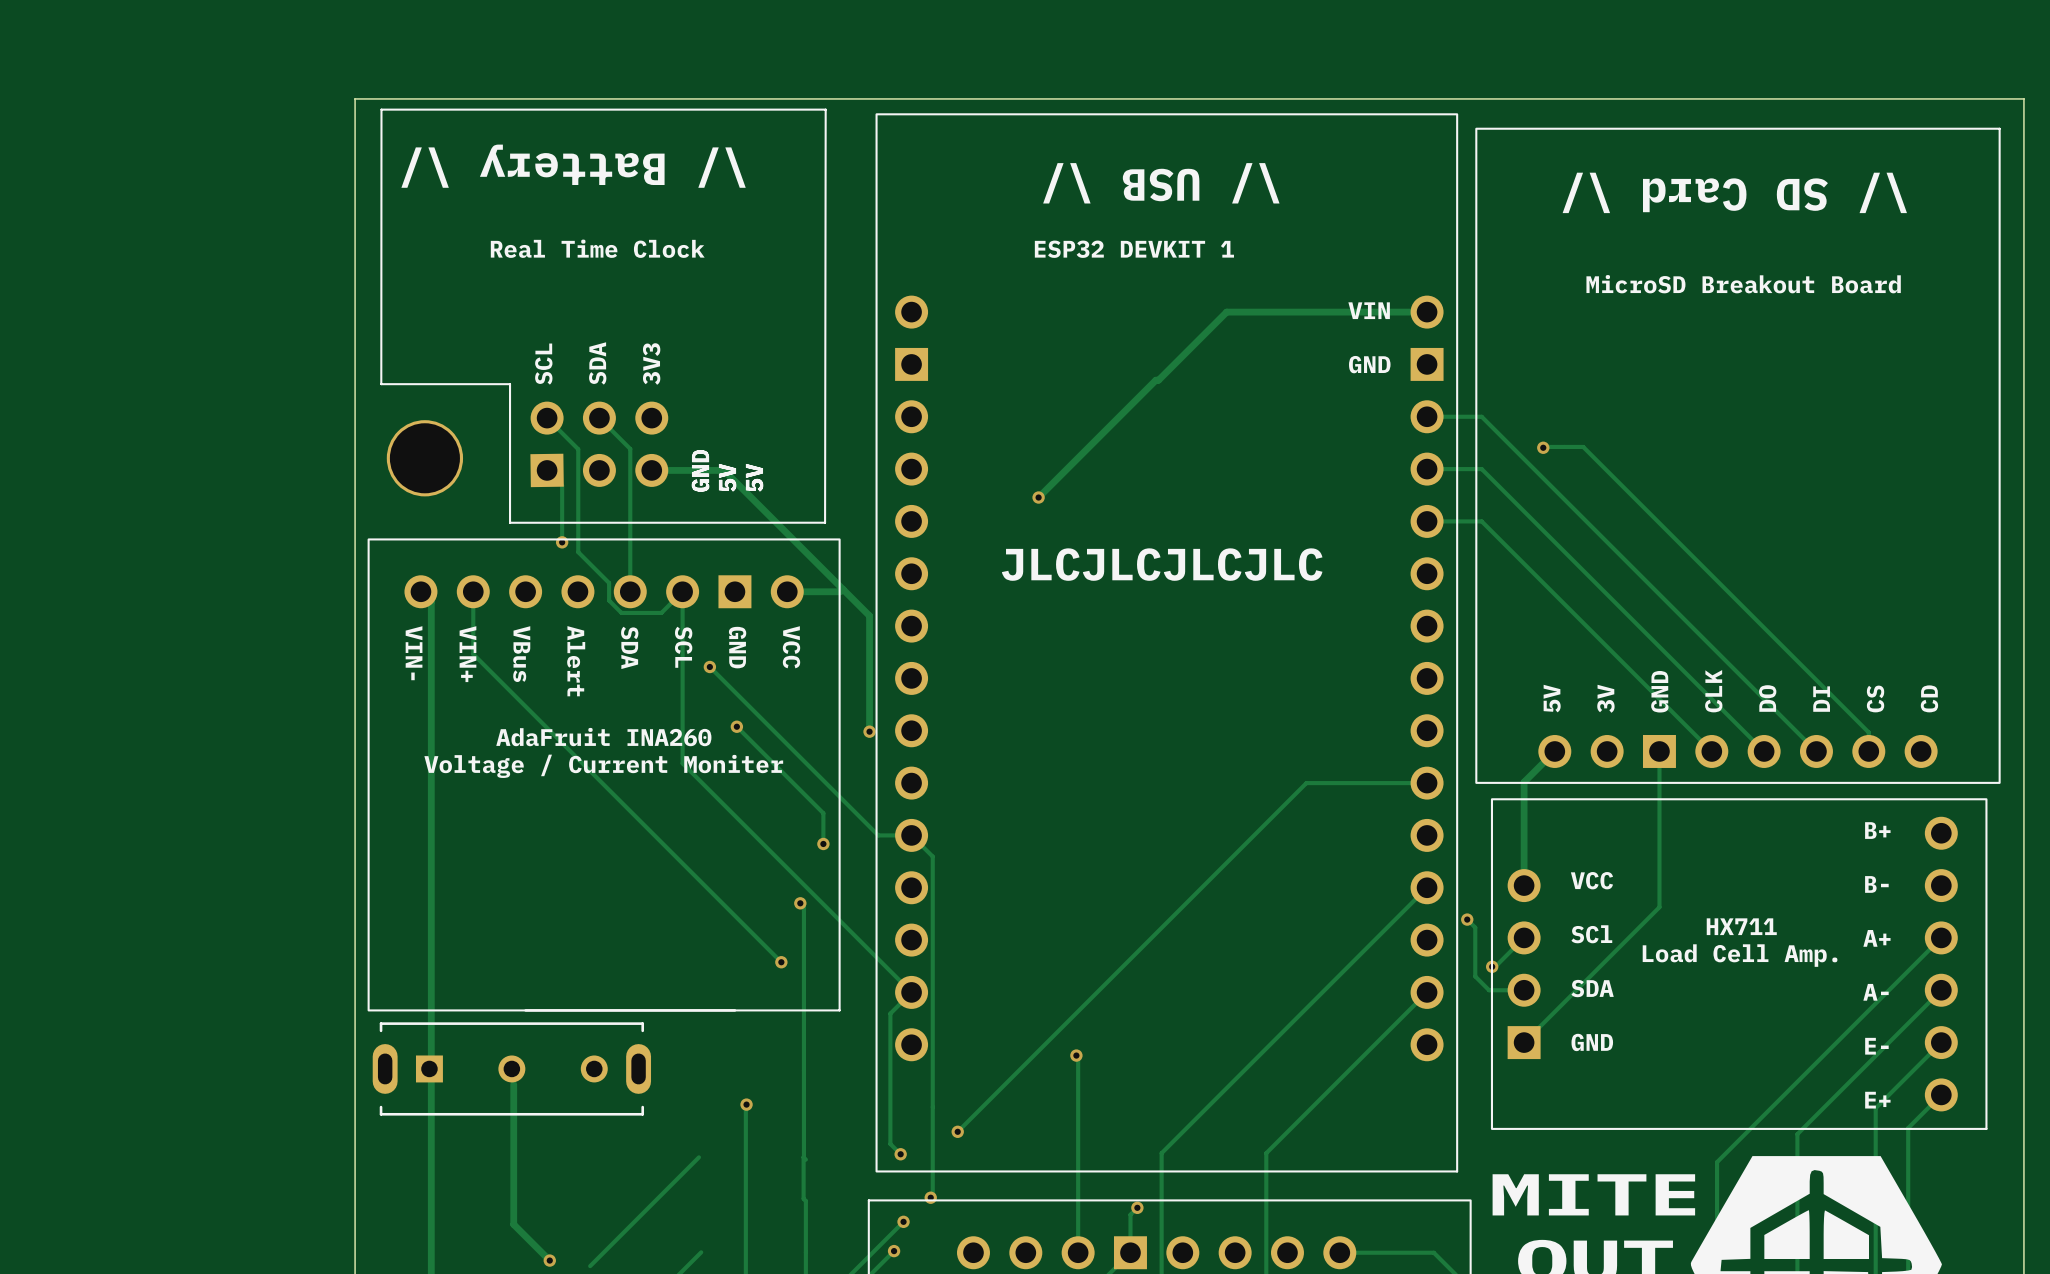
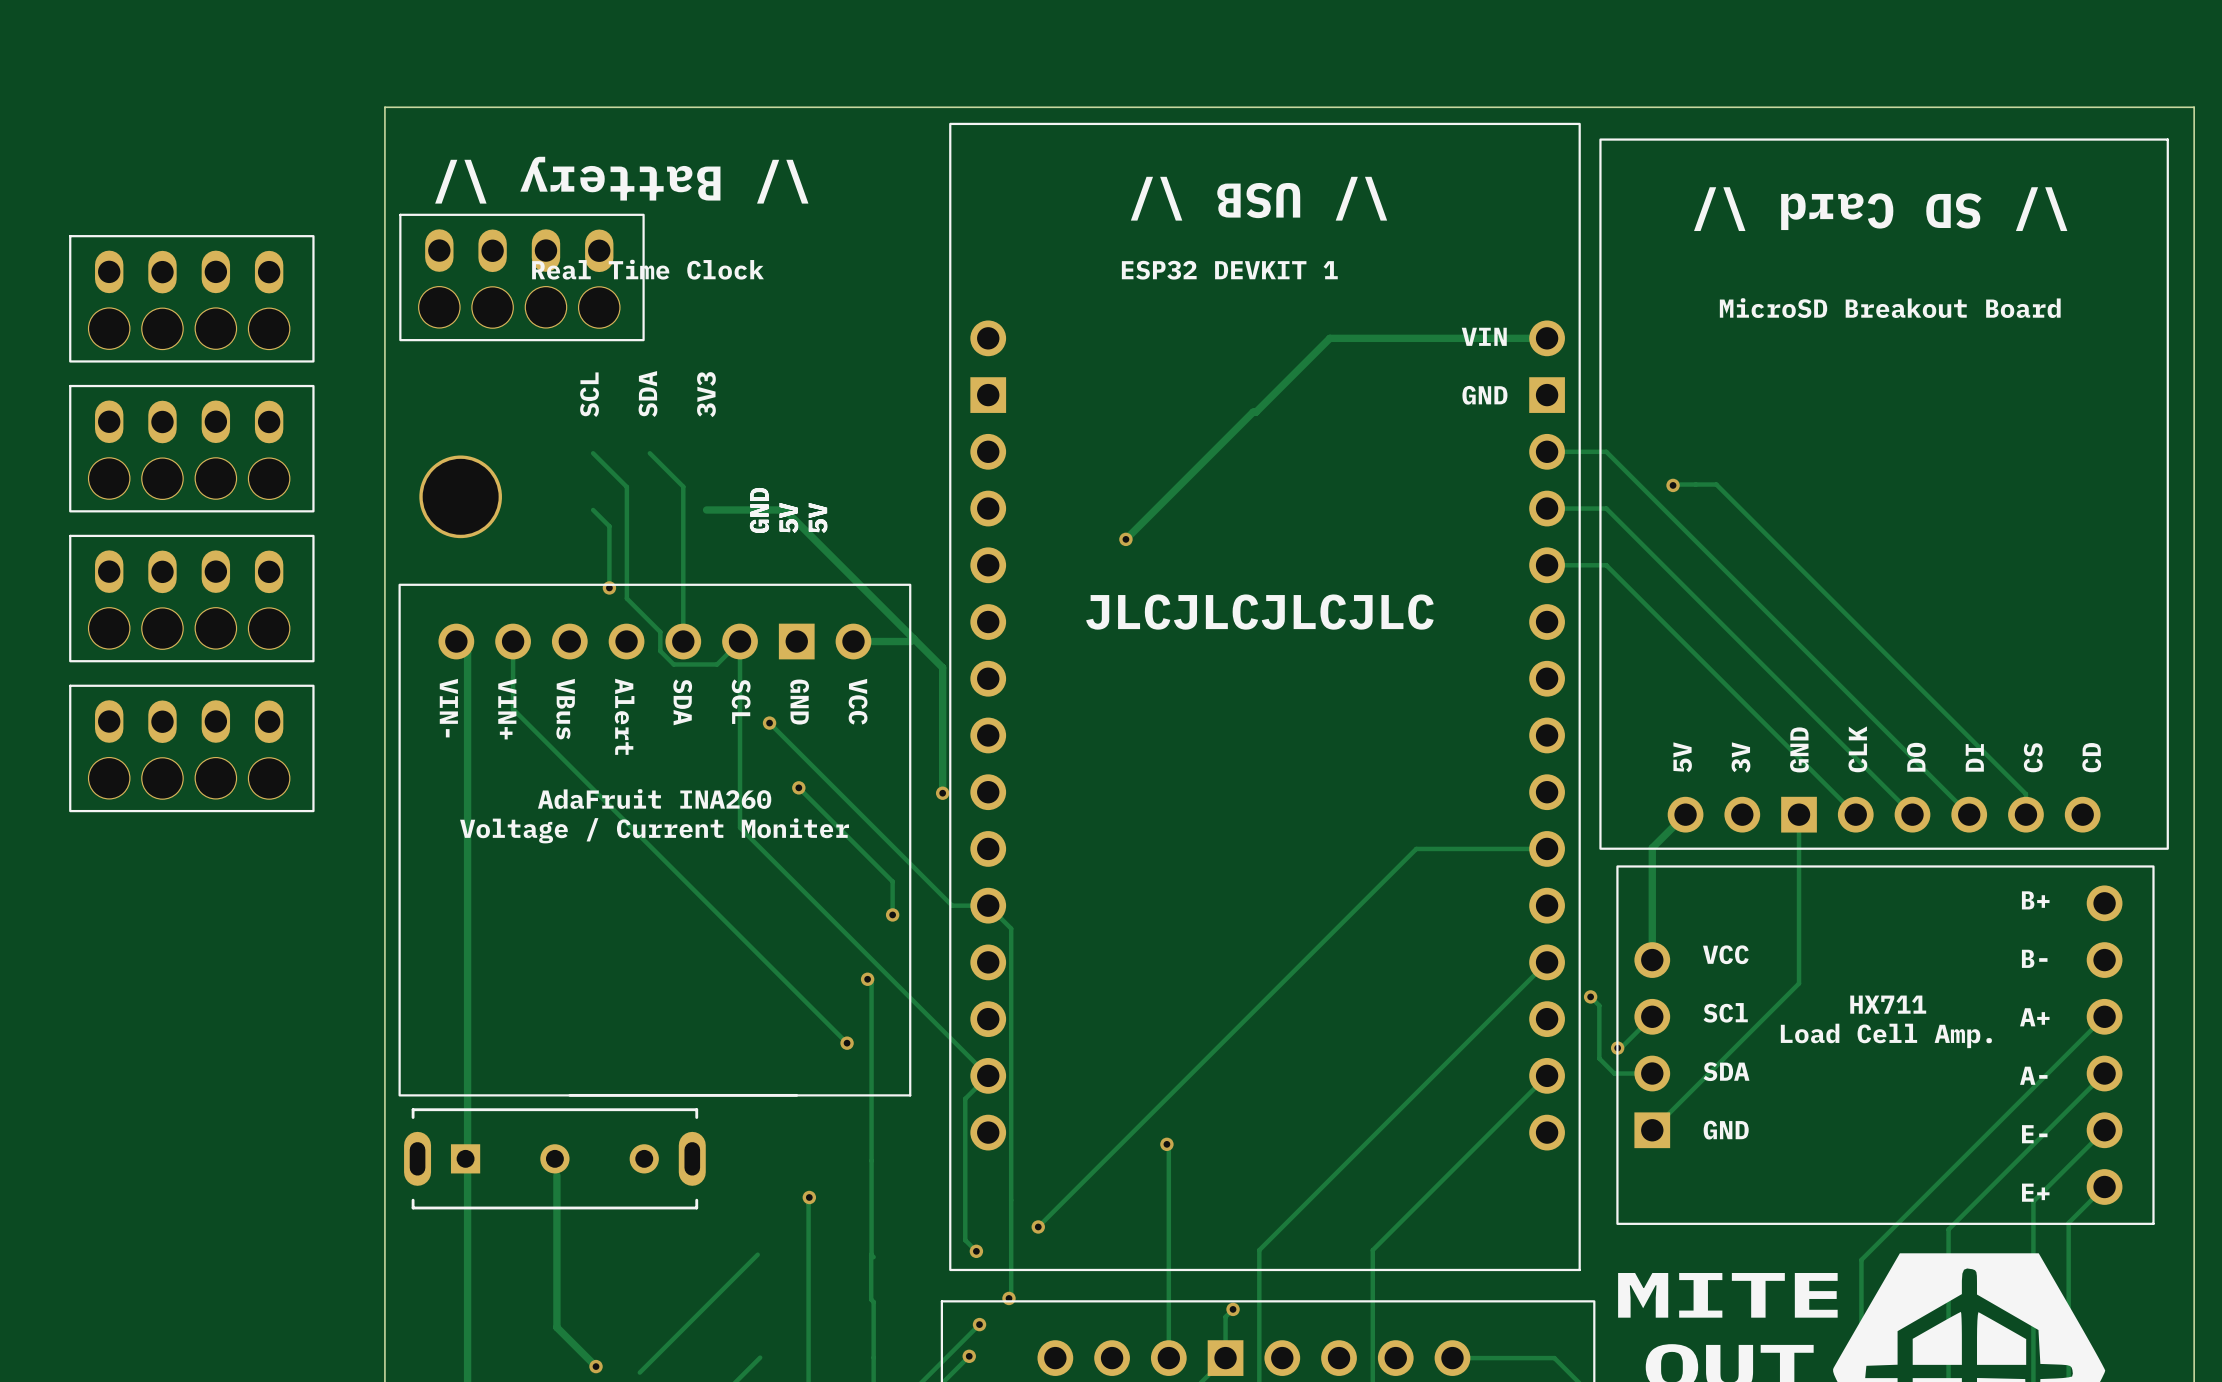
part: none -> (521, 277)
part: none -> (191, 298)
part: (603, 316) -> none
part: none -> (191, 448)
part: none -> (191, 598)
part: none -> (191, 748)

